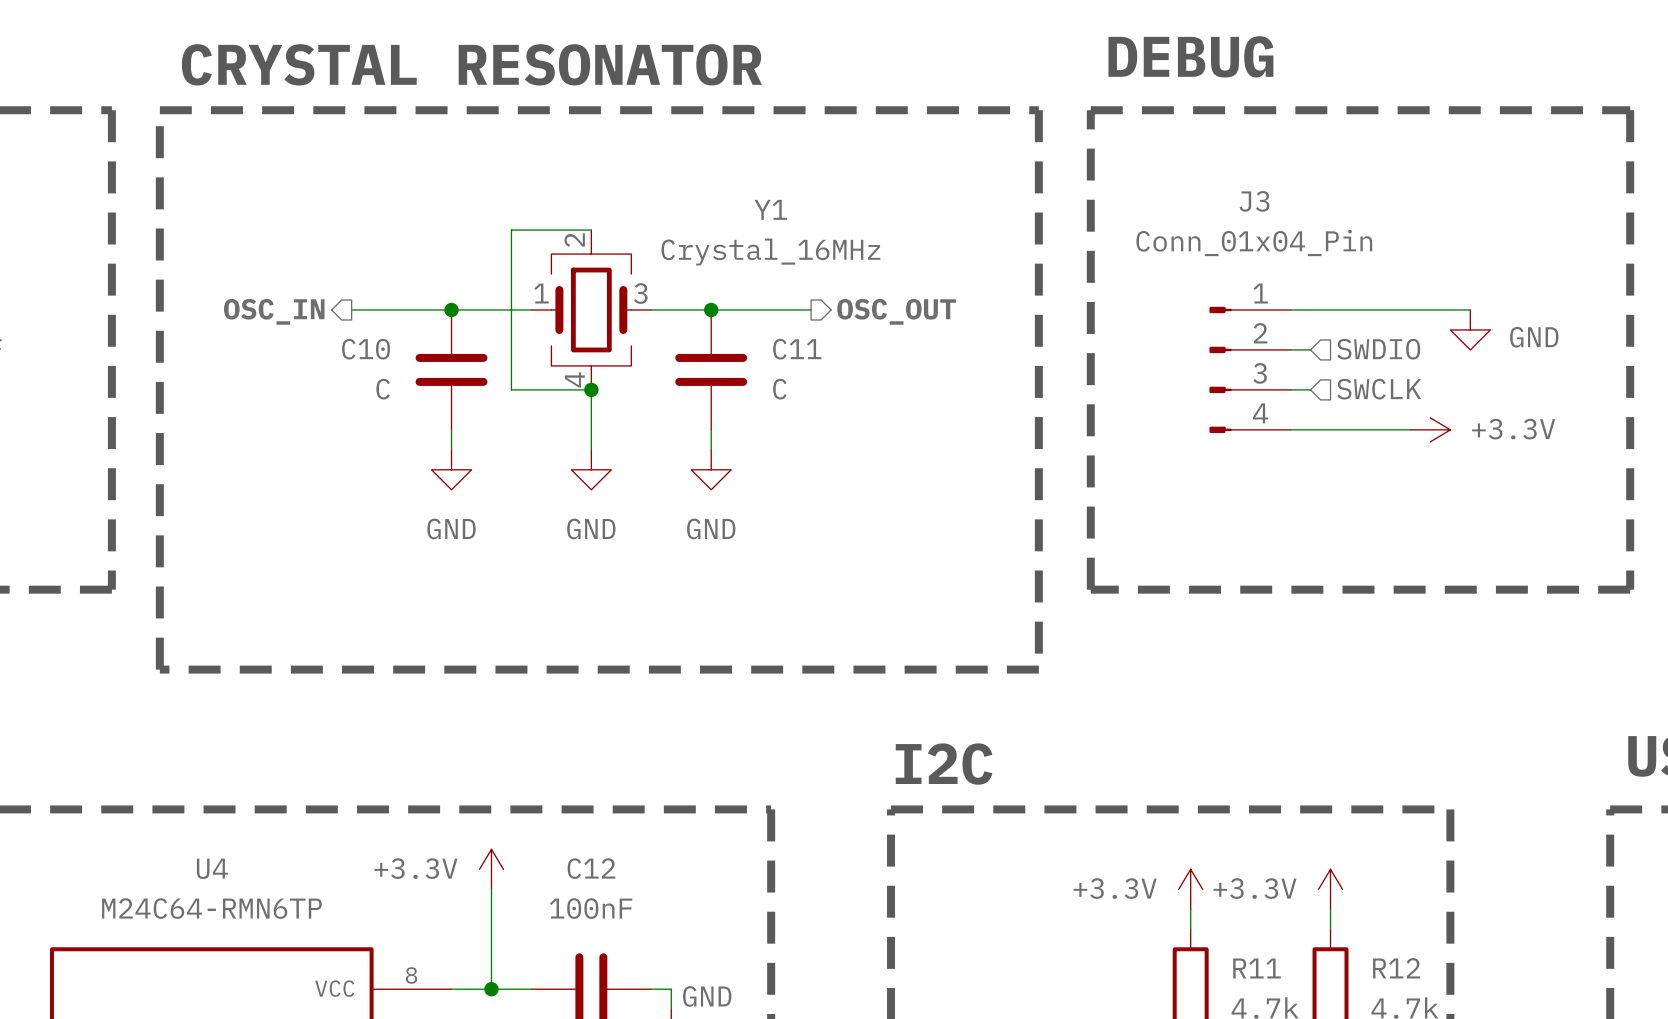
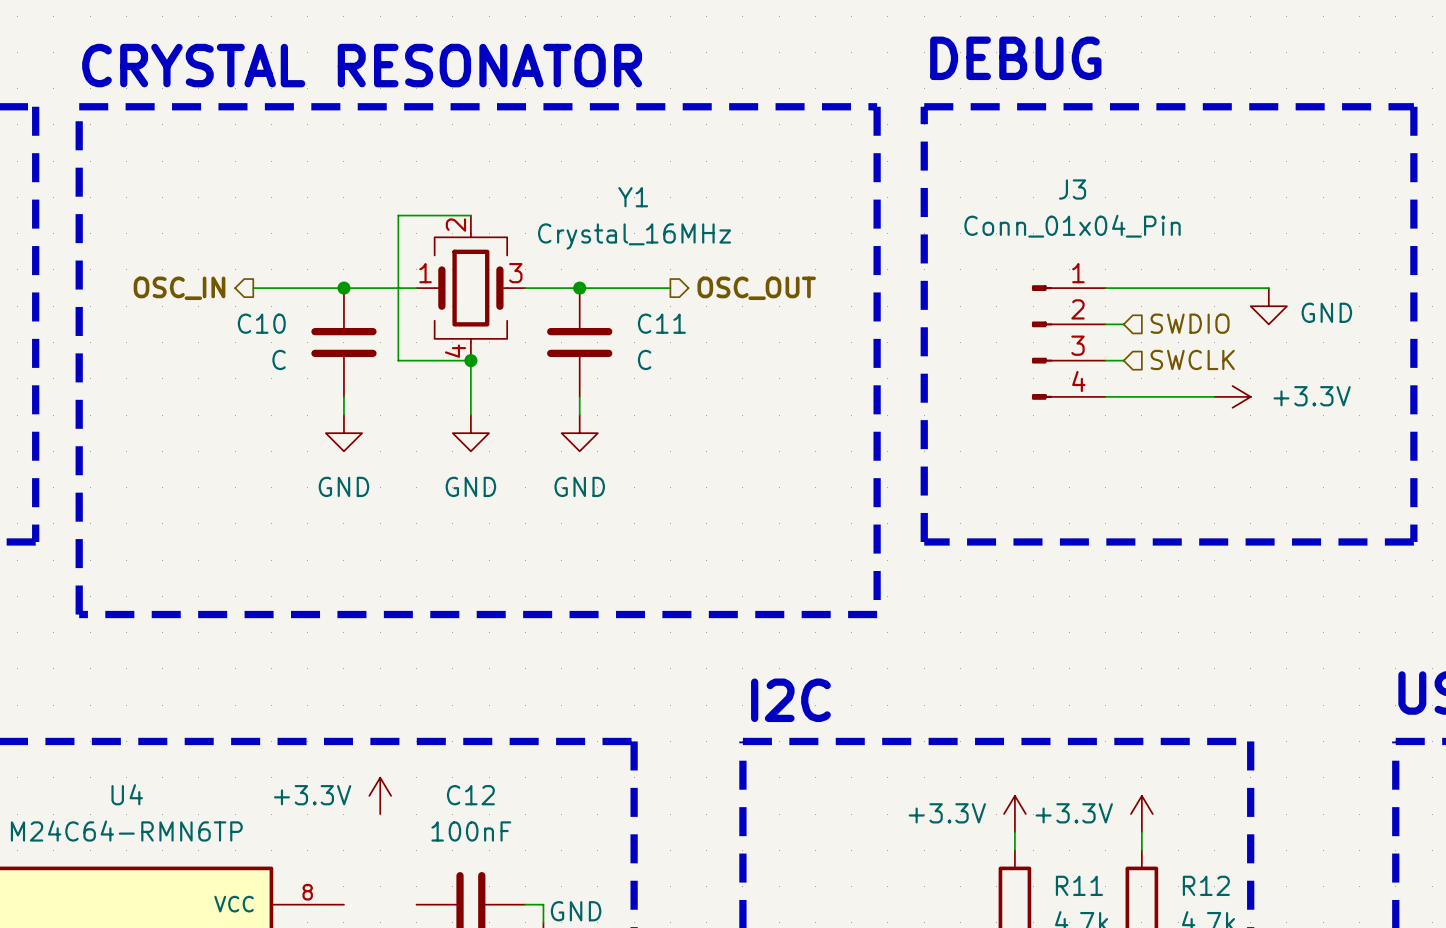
wire: (491, 889) (491, 989) -> none
wire: (451, 989) (531, 989) -> none
junction: (491, 989) -> none

